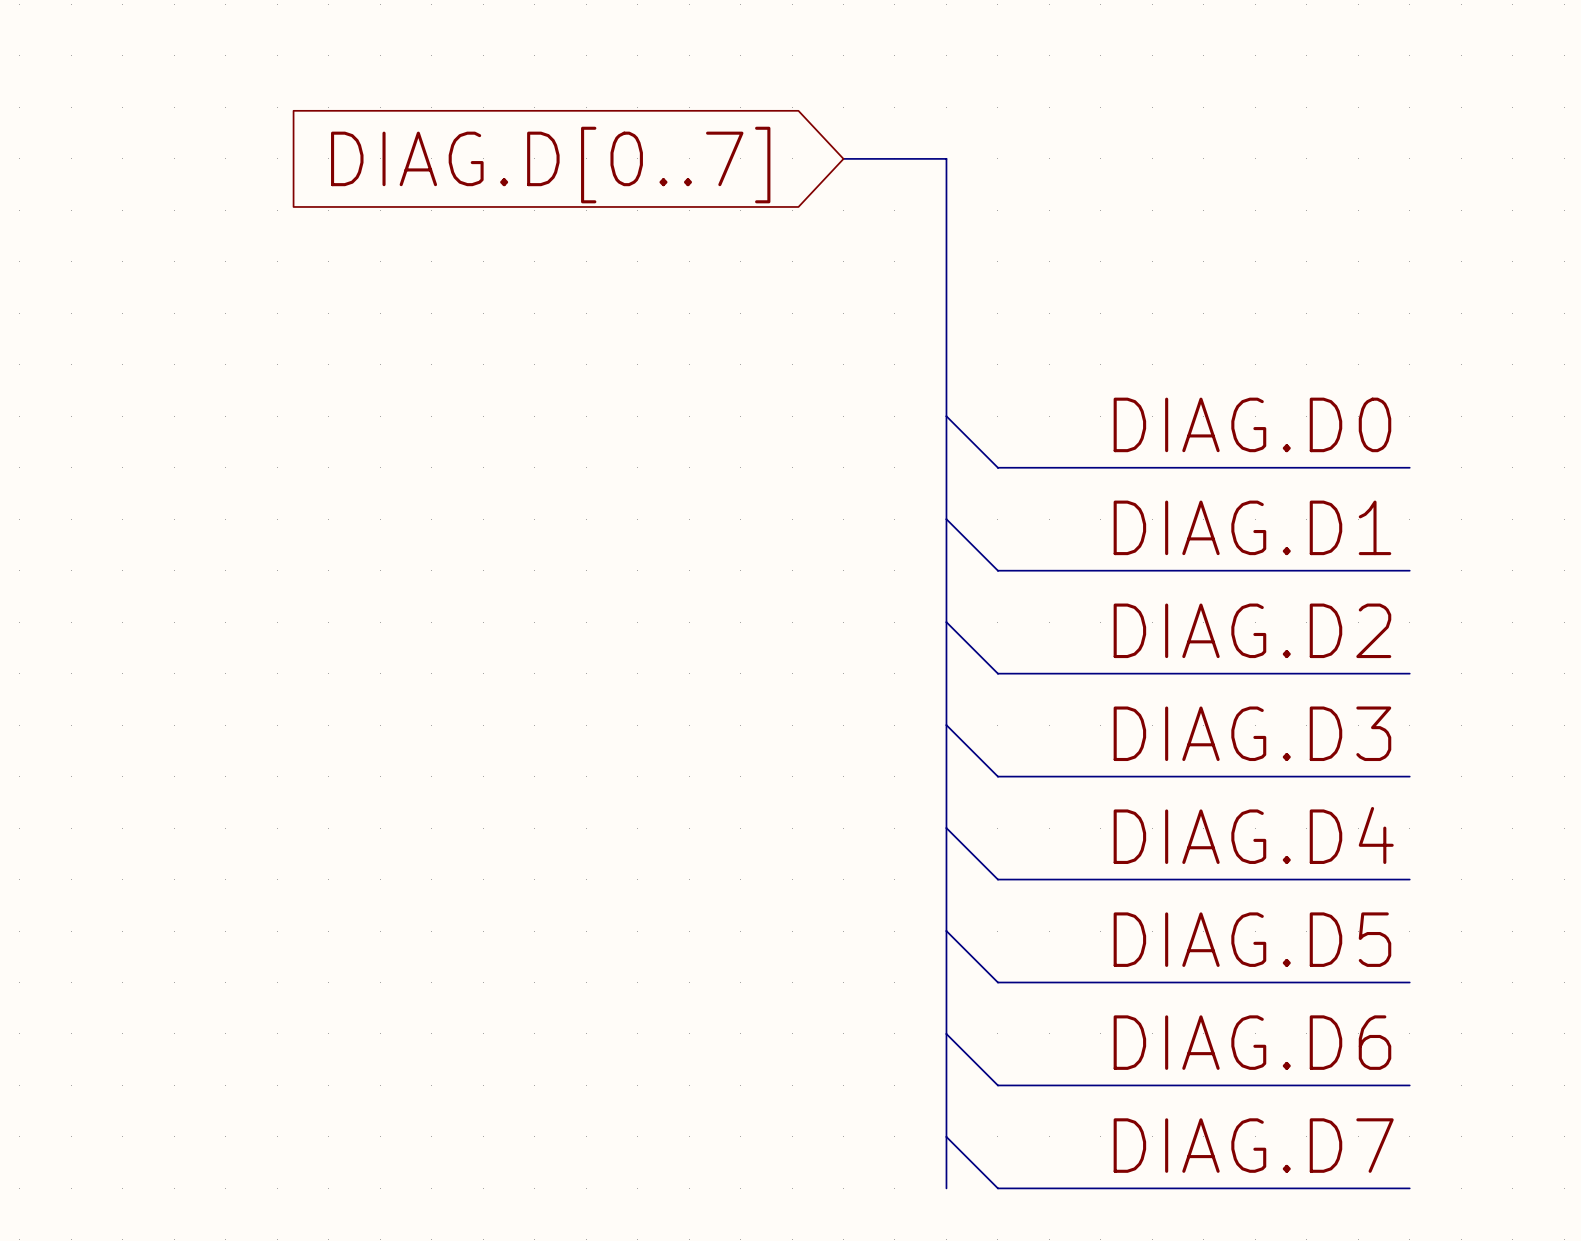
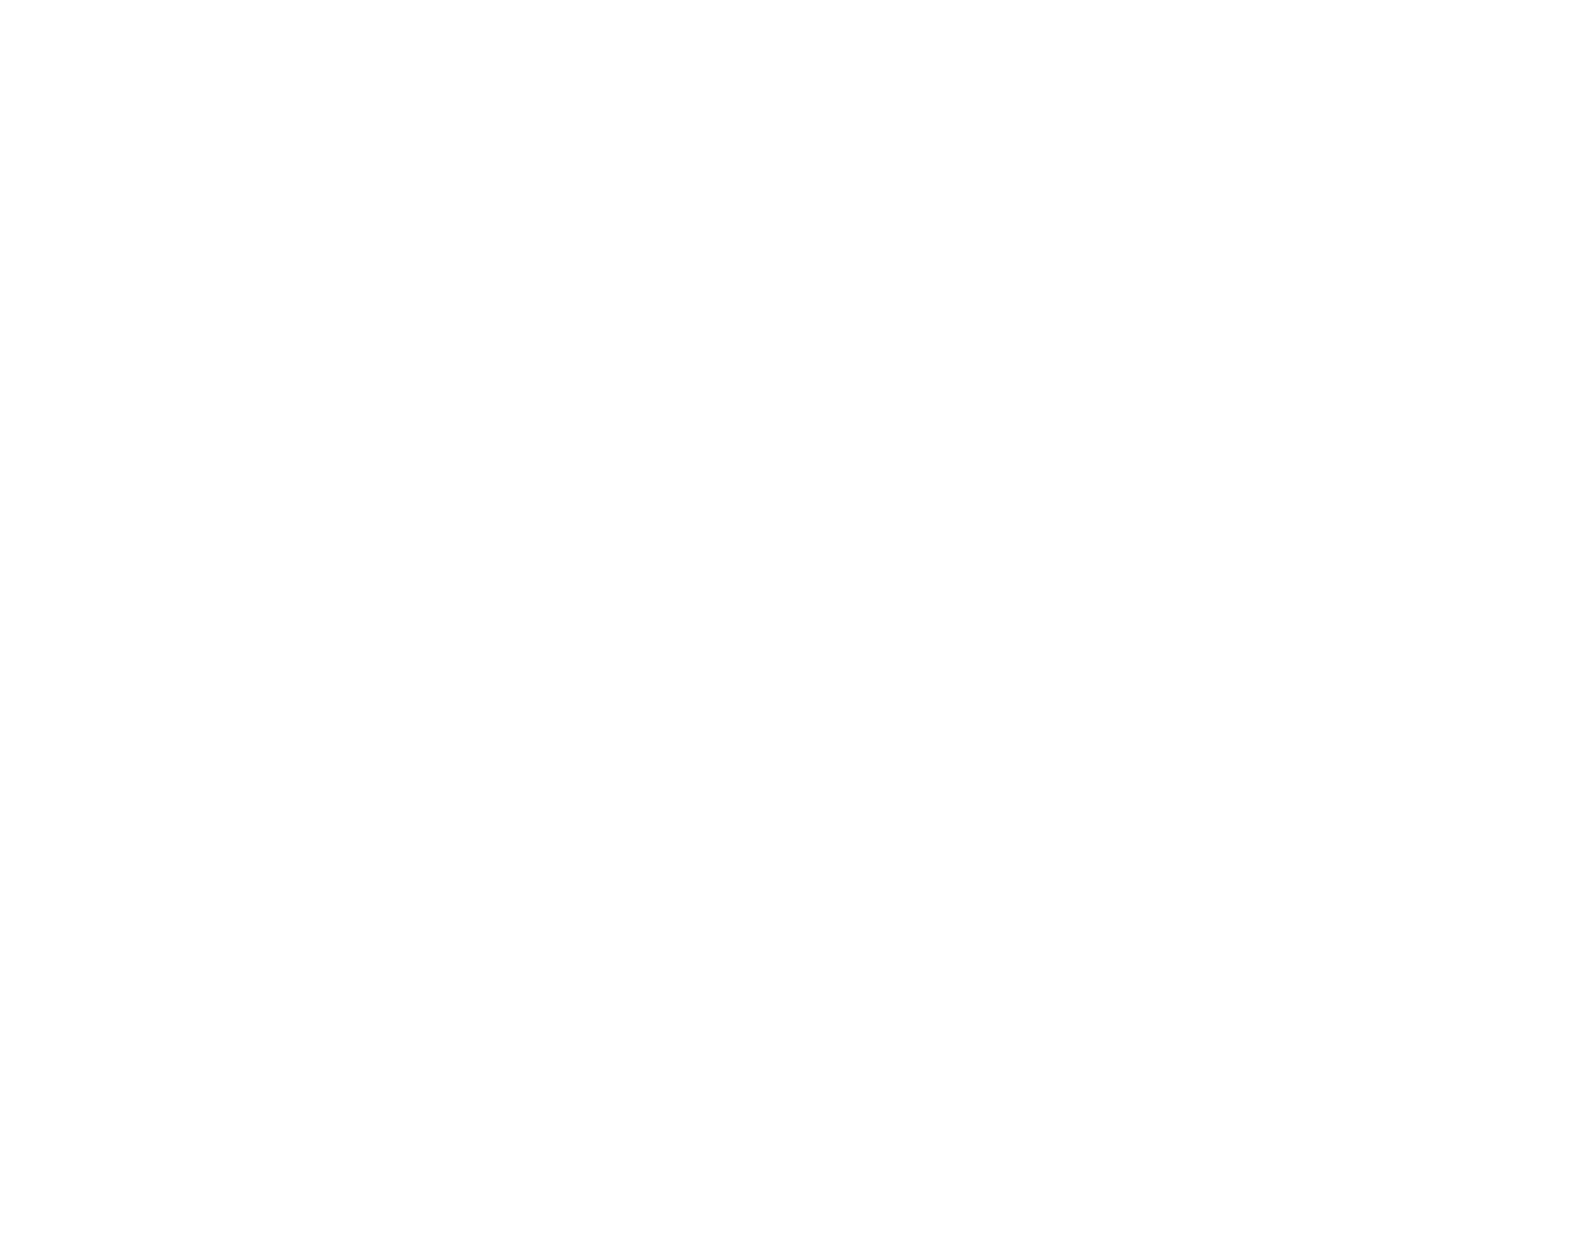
bus: (843, 158) (946, 158) (946, 1188) -> none
global label: DIAG.D[0..7] (550, 165) -> none
wire: (946, 416) (997, 467) (1409, 467) -> none
label: DIAG.D0 (1252, 424) -> none
wire: (946, 519) (997, 570) (1409, 570) -> none
label: DIAG.D1 (1252, 527) -> none
wire: (946, 622) (997, 673) (1409, 673) -> none
label: DIAG.D2 (1252, 630) -> none
wire: (946, 725) (997, 776) (1409, 776) -> none
label: DIAG.D3 (1252, 733) -> none
wire: (946, 828) (997, 879) (1409, 879) -> none
label: DIAG.D4 (1253, 835) -> none
wire: (946, 931) (997, 982) (1409, 982) -> none
label: DIAG.D5 (1252, 939) -> none
wire: (946, 1033) (997, 1085) (1409, 1085) -> none
label: DIAG.D6 (1252, 1042) -> none
wire: (946, 1136) (997, 1188) (1409, 1188) -> none
label: DIAG.D7 (1253, 1145) -> none

